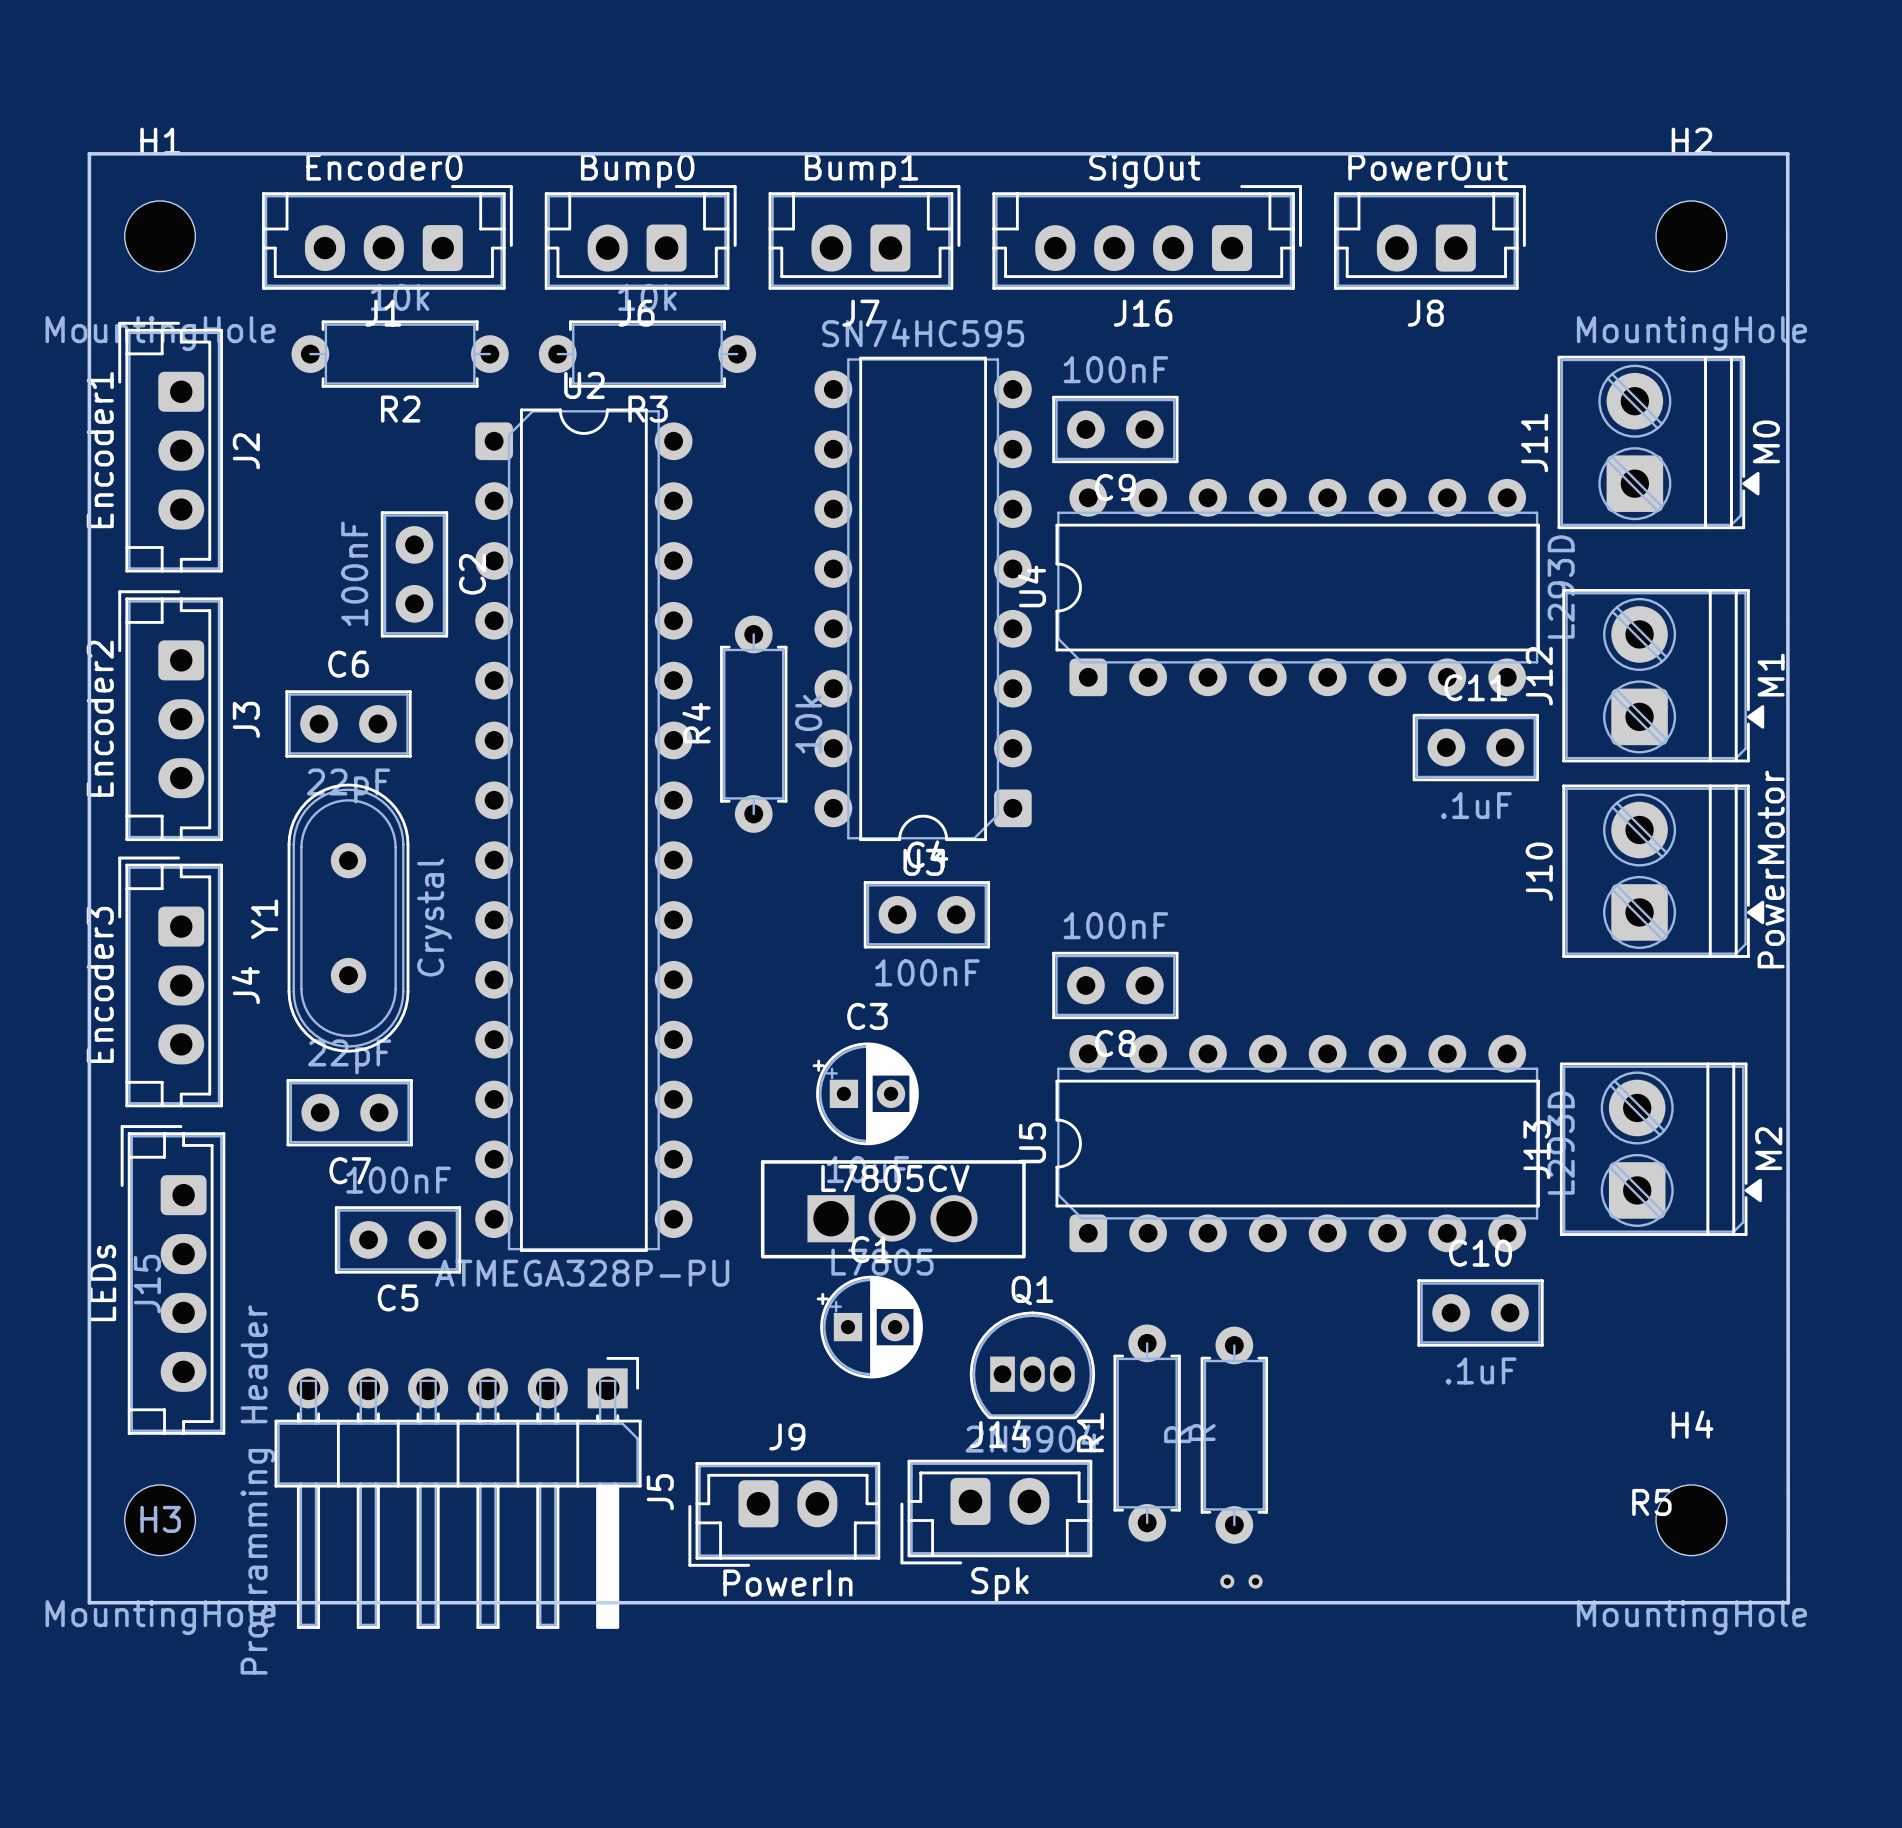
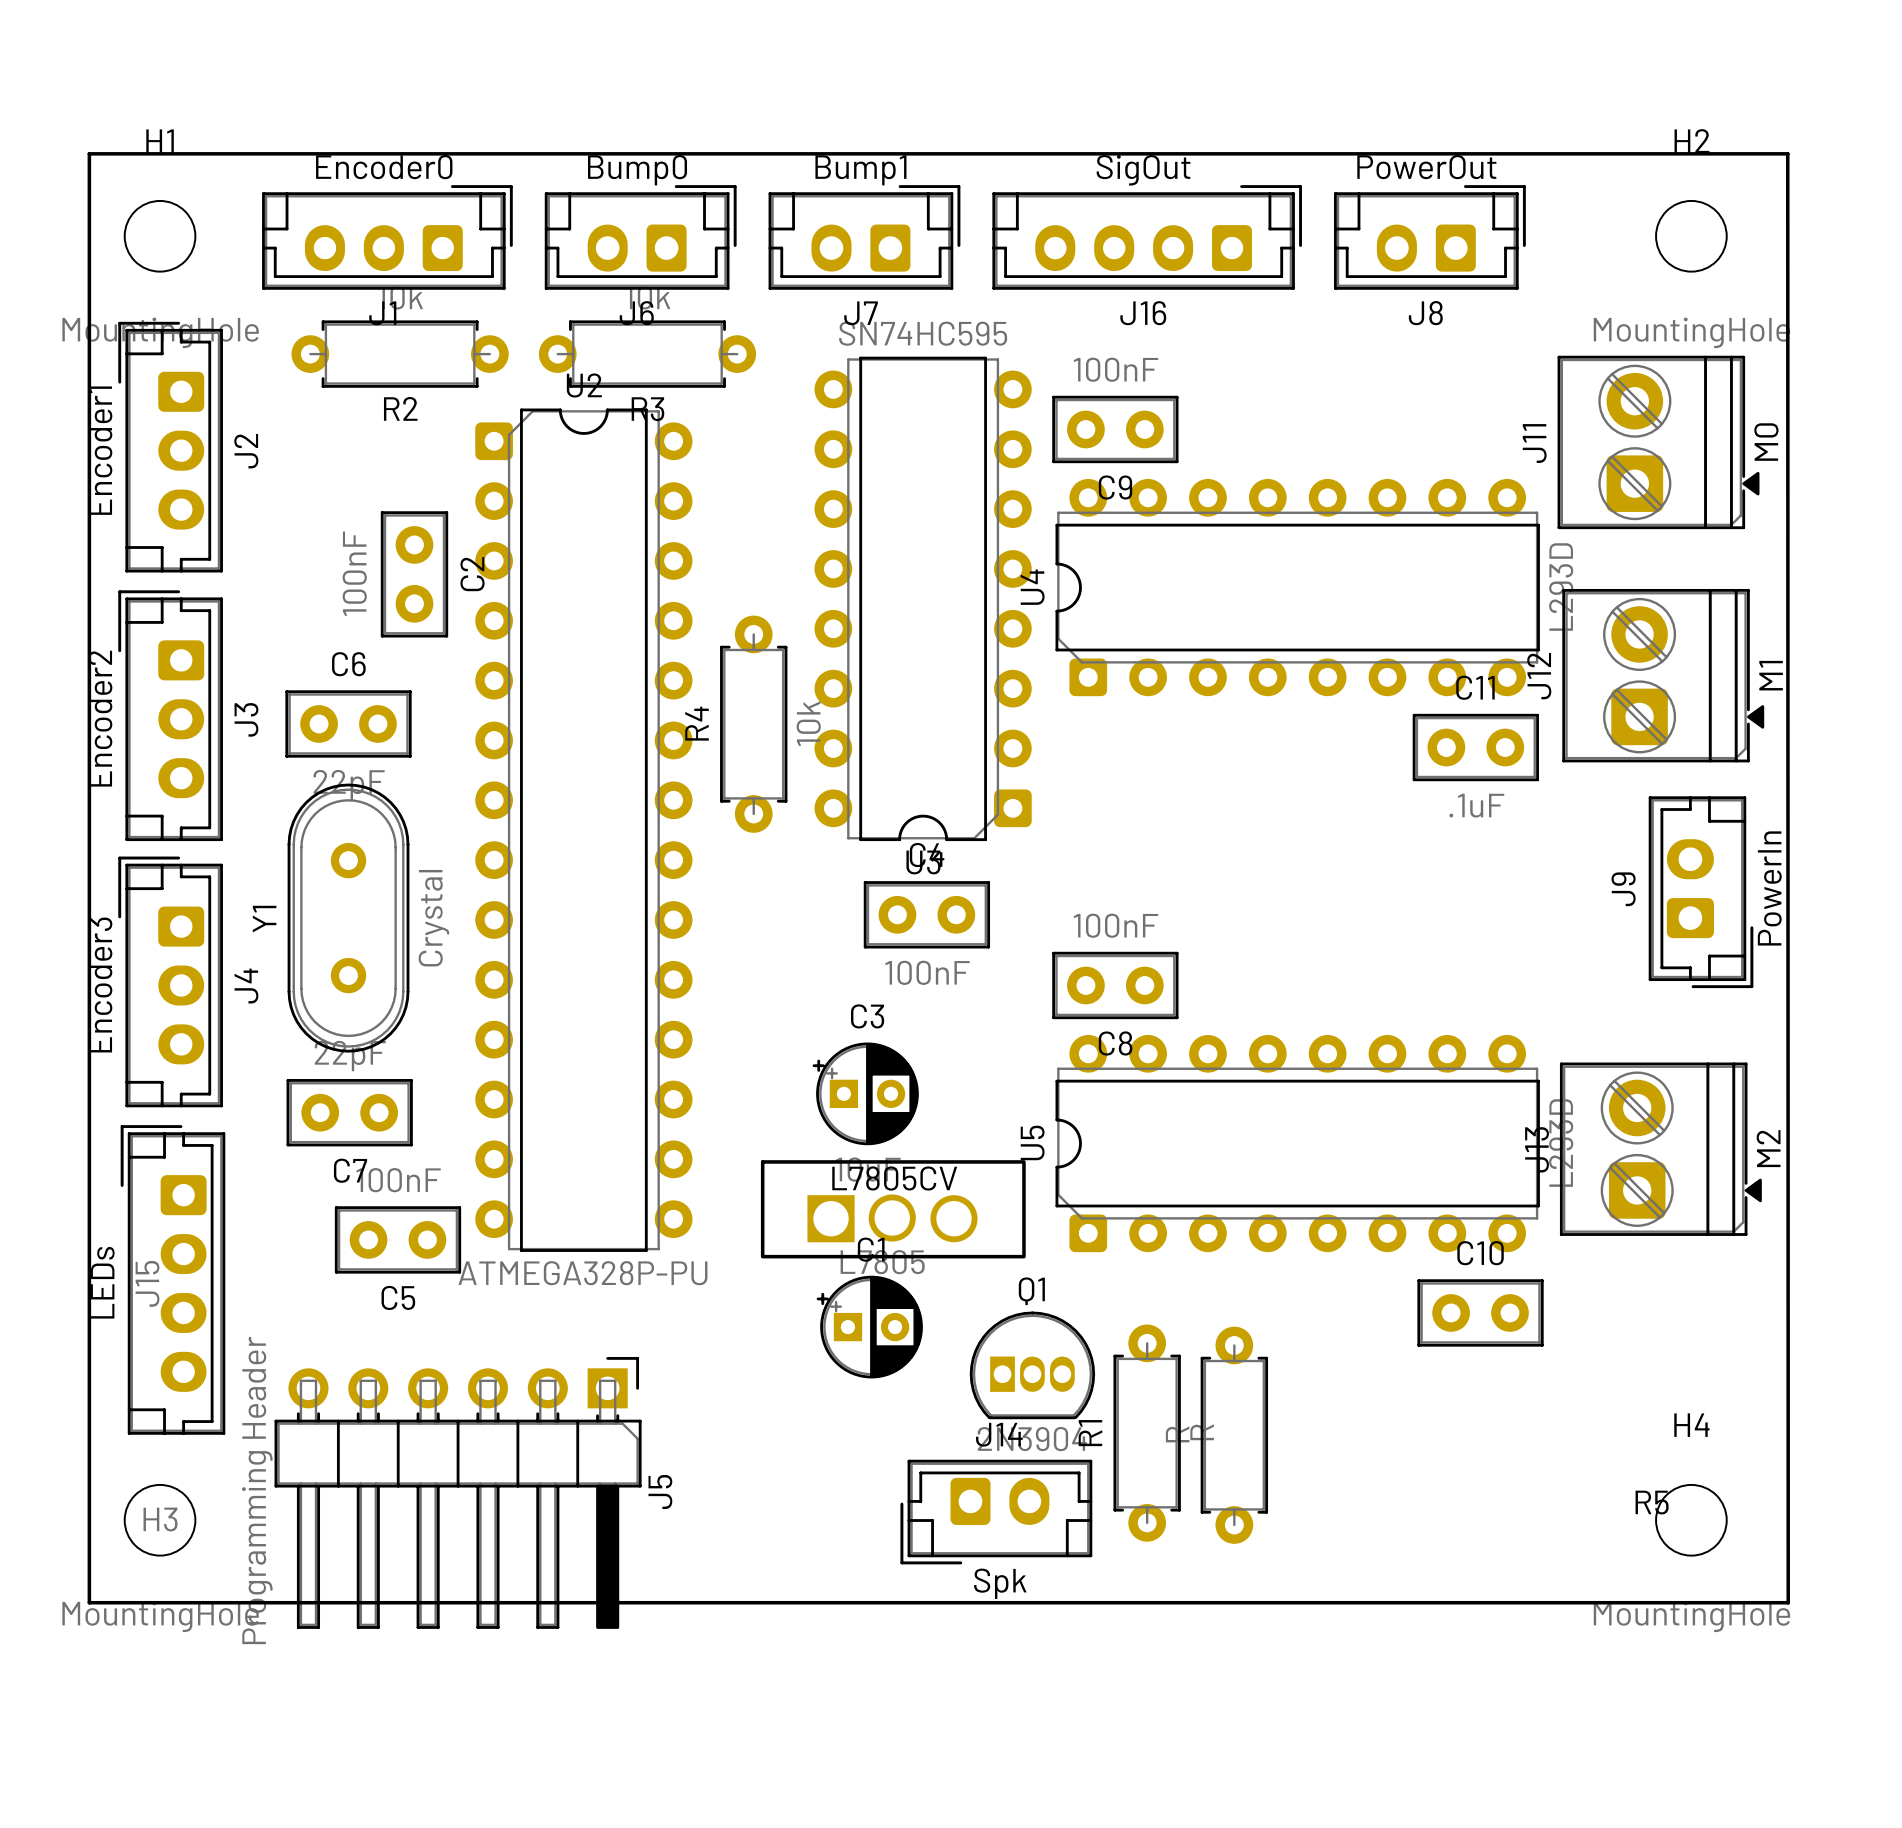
J10: PowerMotor (1663, 871) -> none
C10 value: .1uF (1481, 1370) -> none
J9 rotation: 0° (784, 1514) -> 90° counterclockwise (1701, 892)
J9 position: (784, 1514) -> (1701, 892)
part: (1241, 1581) -> none

